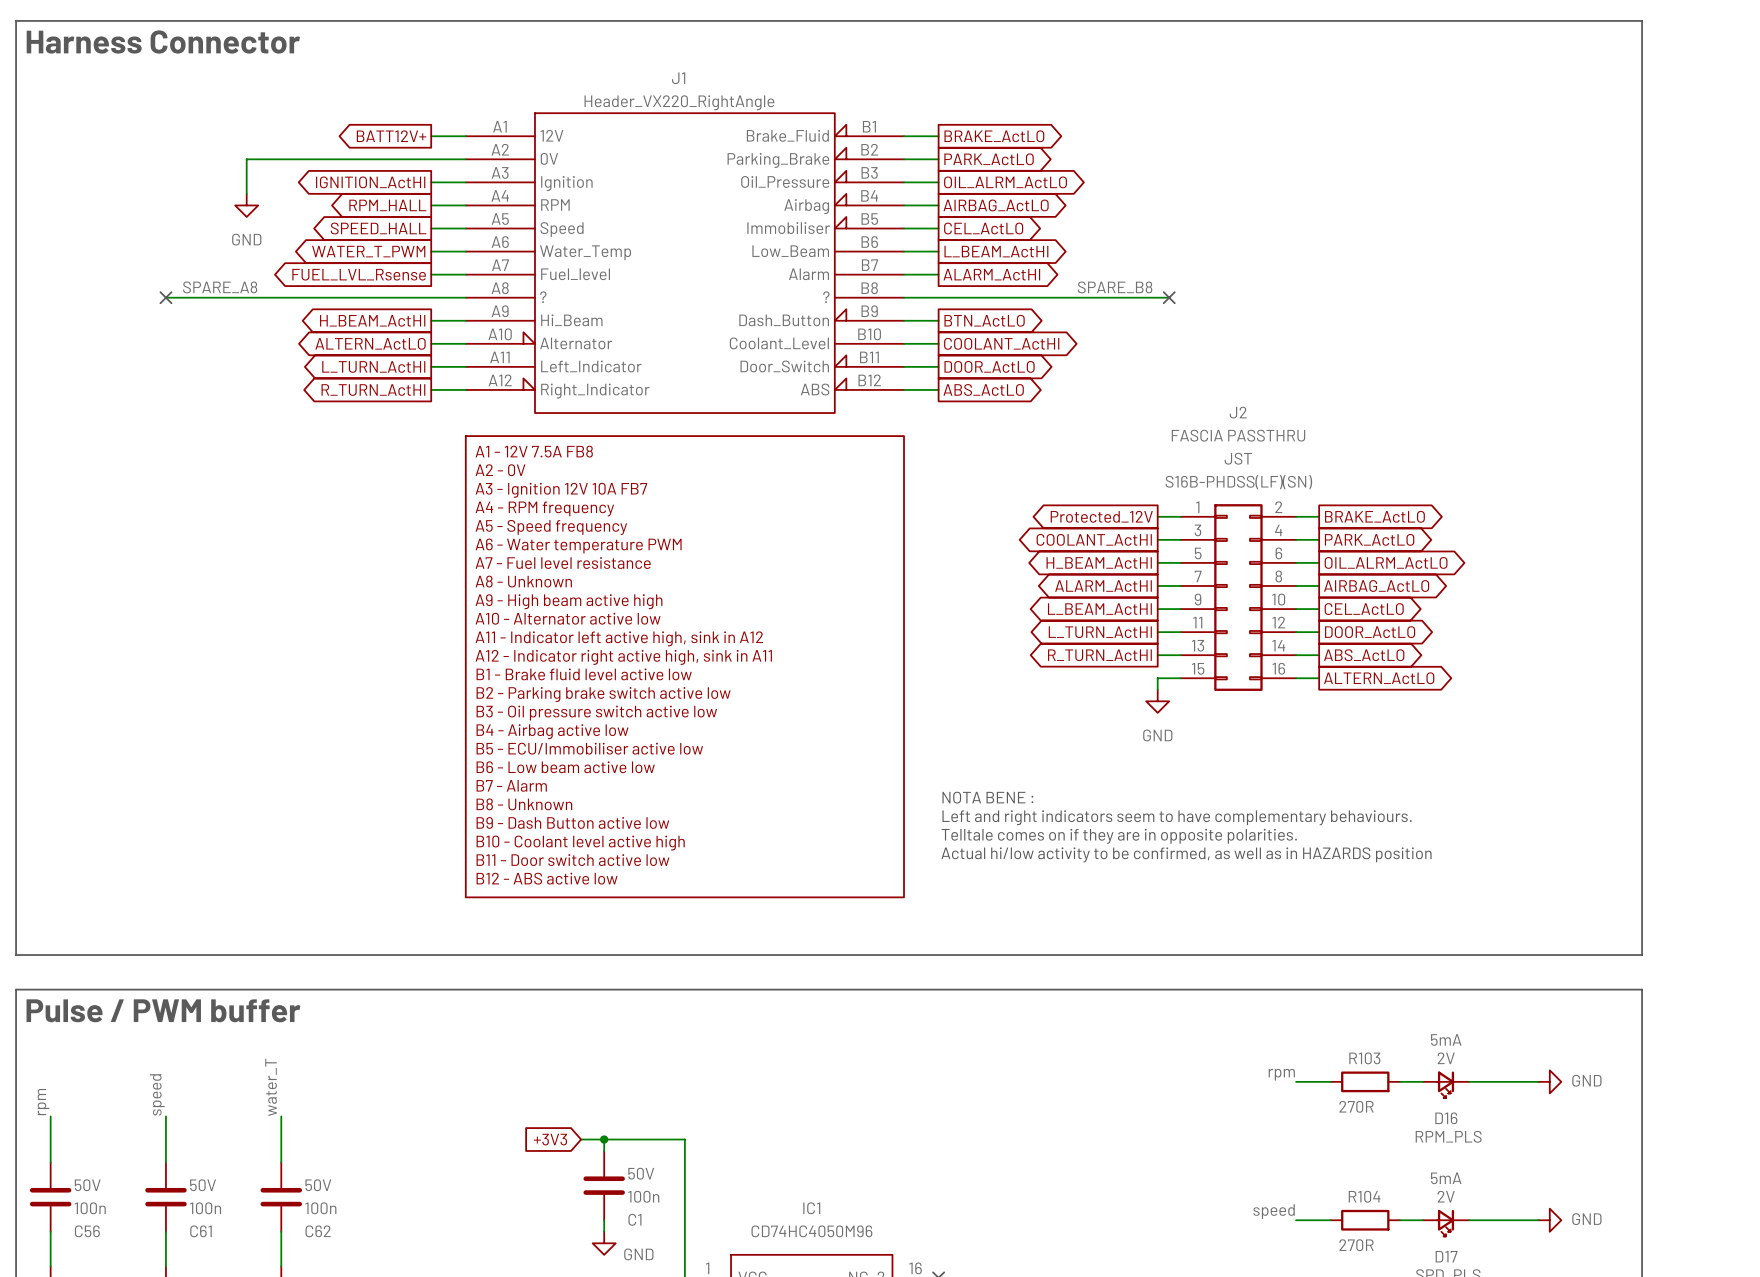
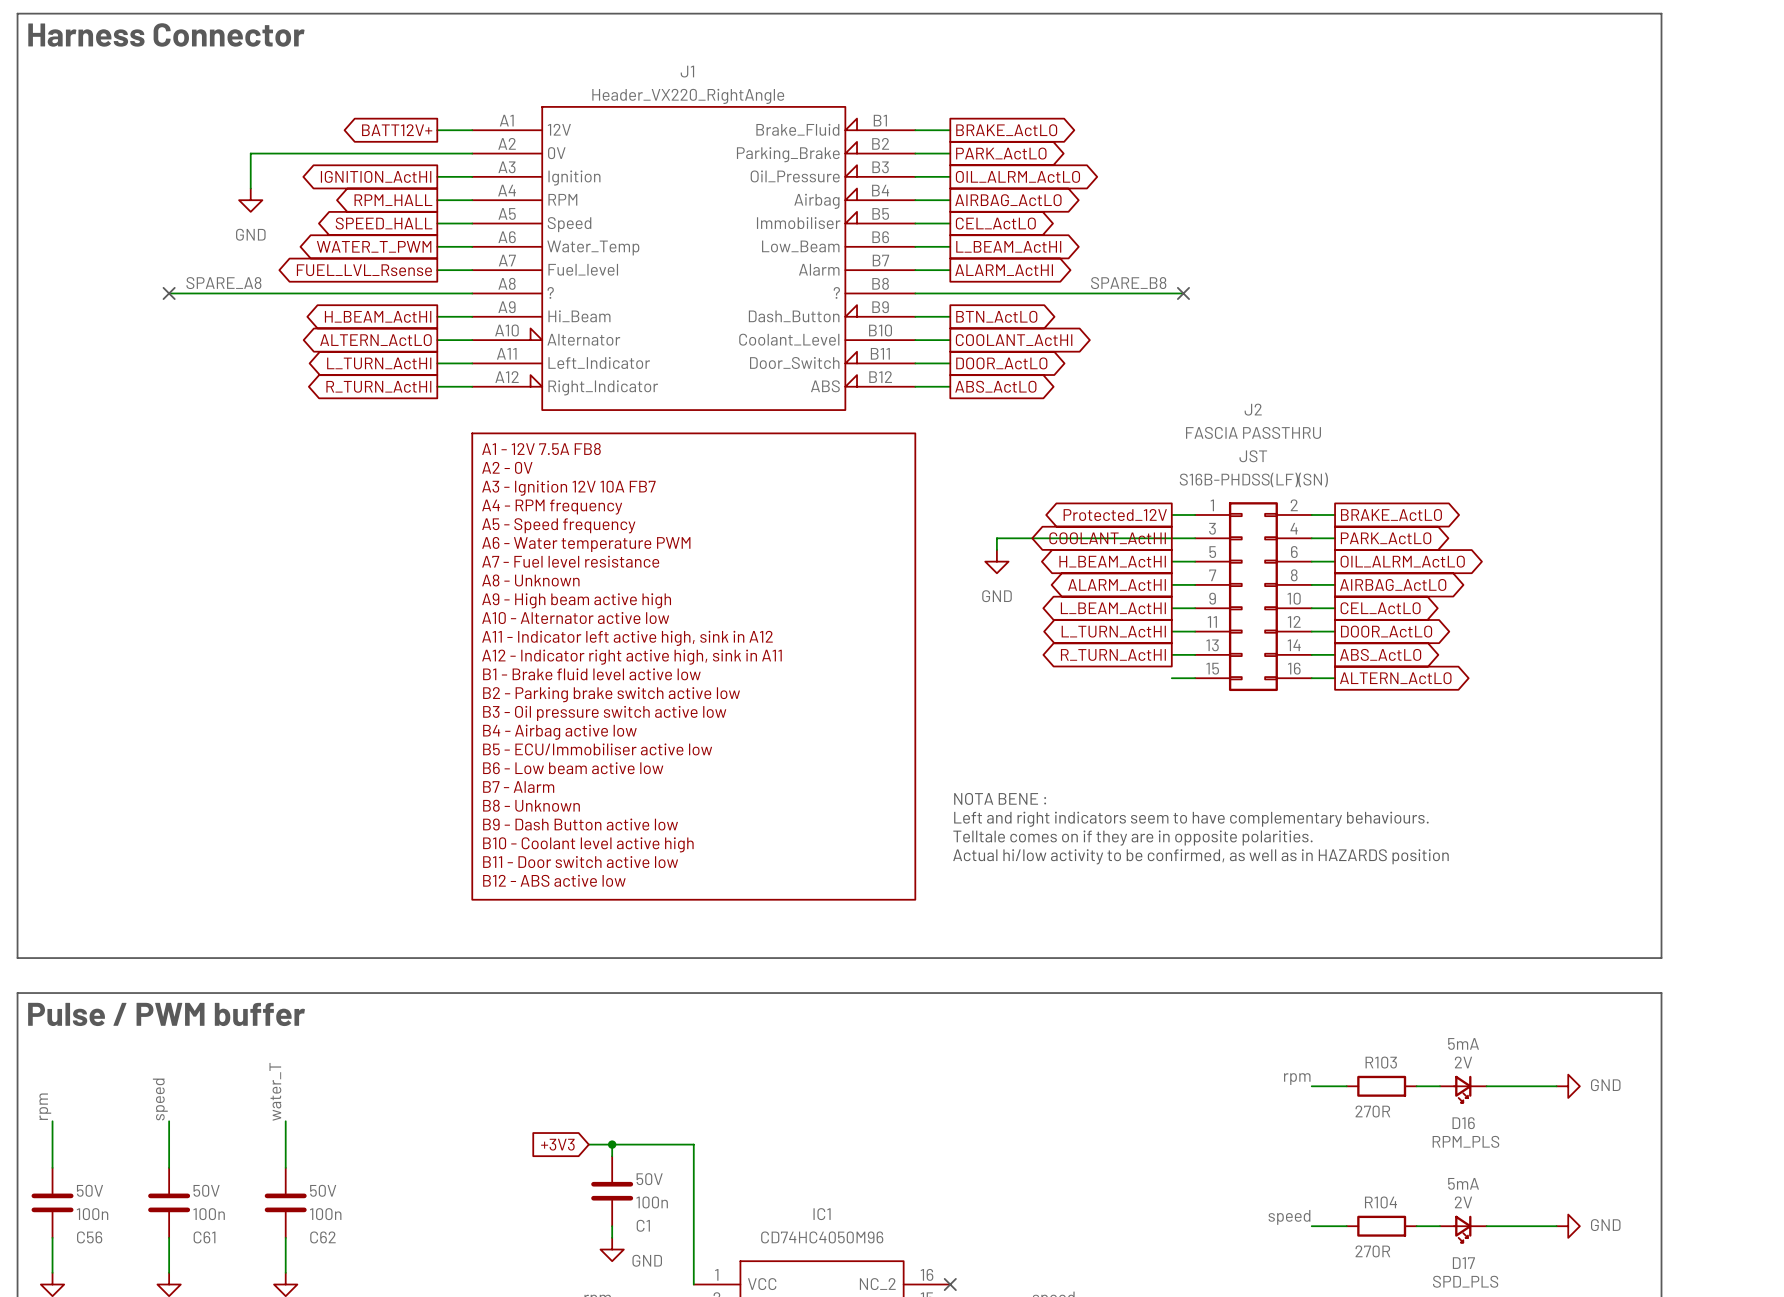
wire: none -> (1171, 538) (996, 538) (996, 549)
wire: (1157, 678) (1157, 689) -> none
power symbol position: GND (1157, 701) -> GND (996, 561)

